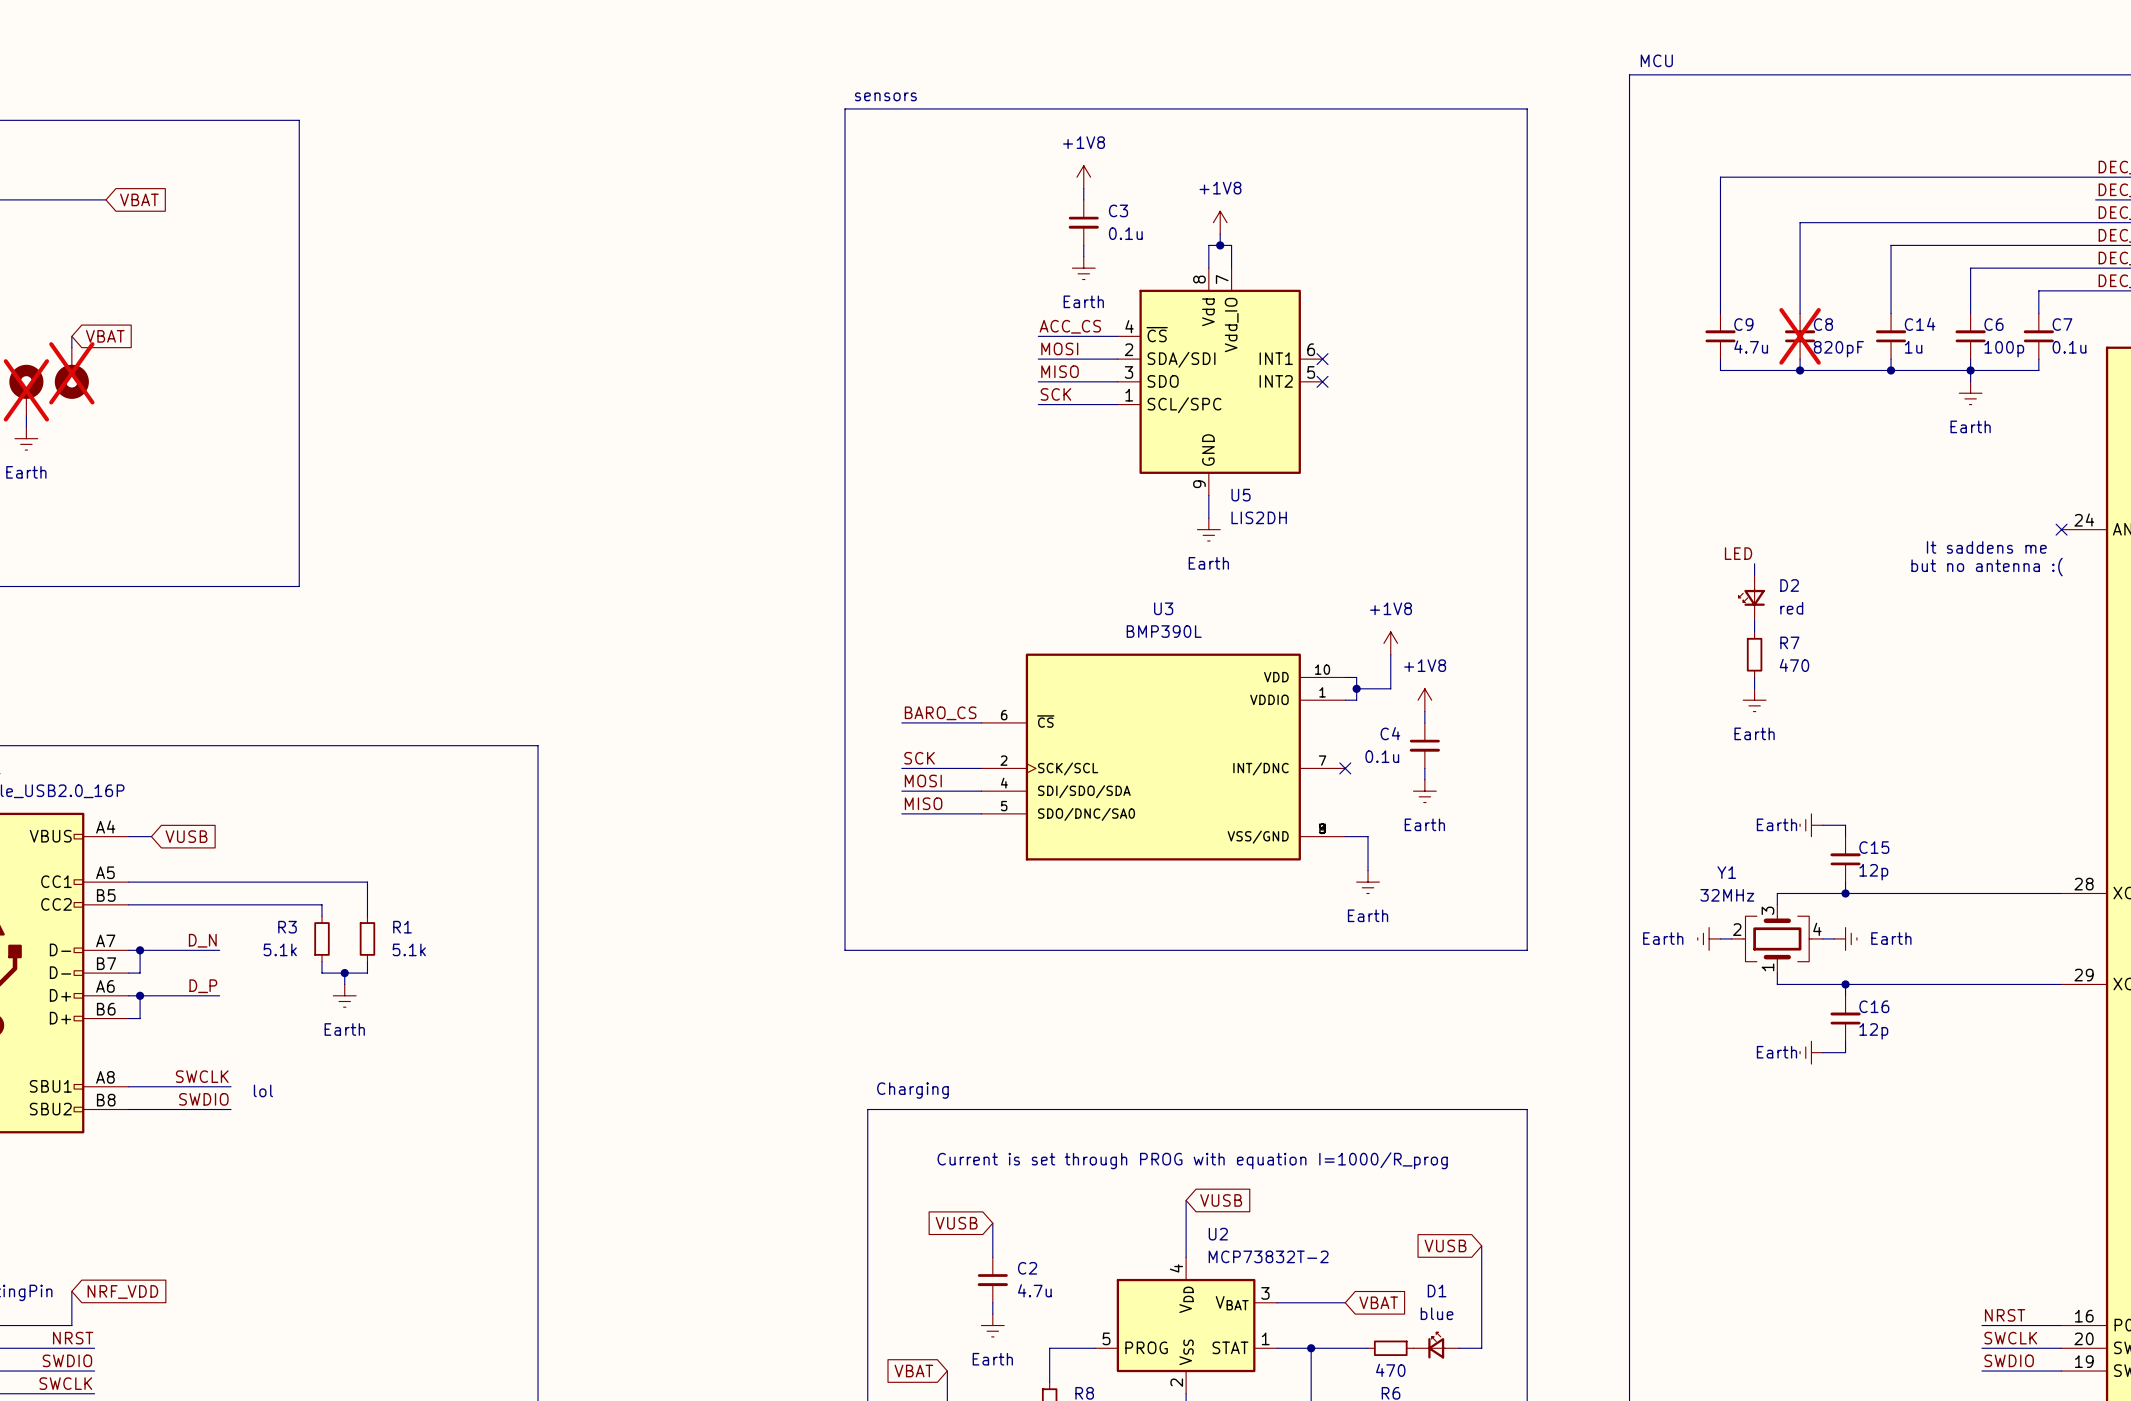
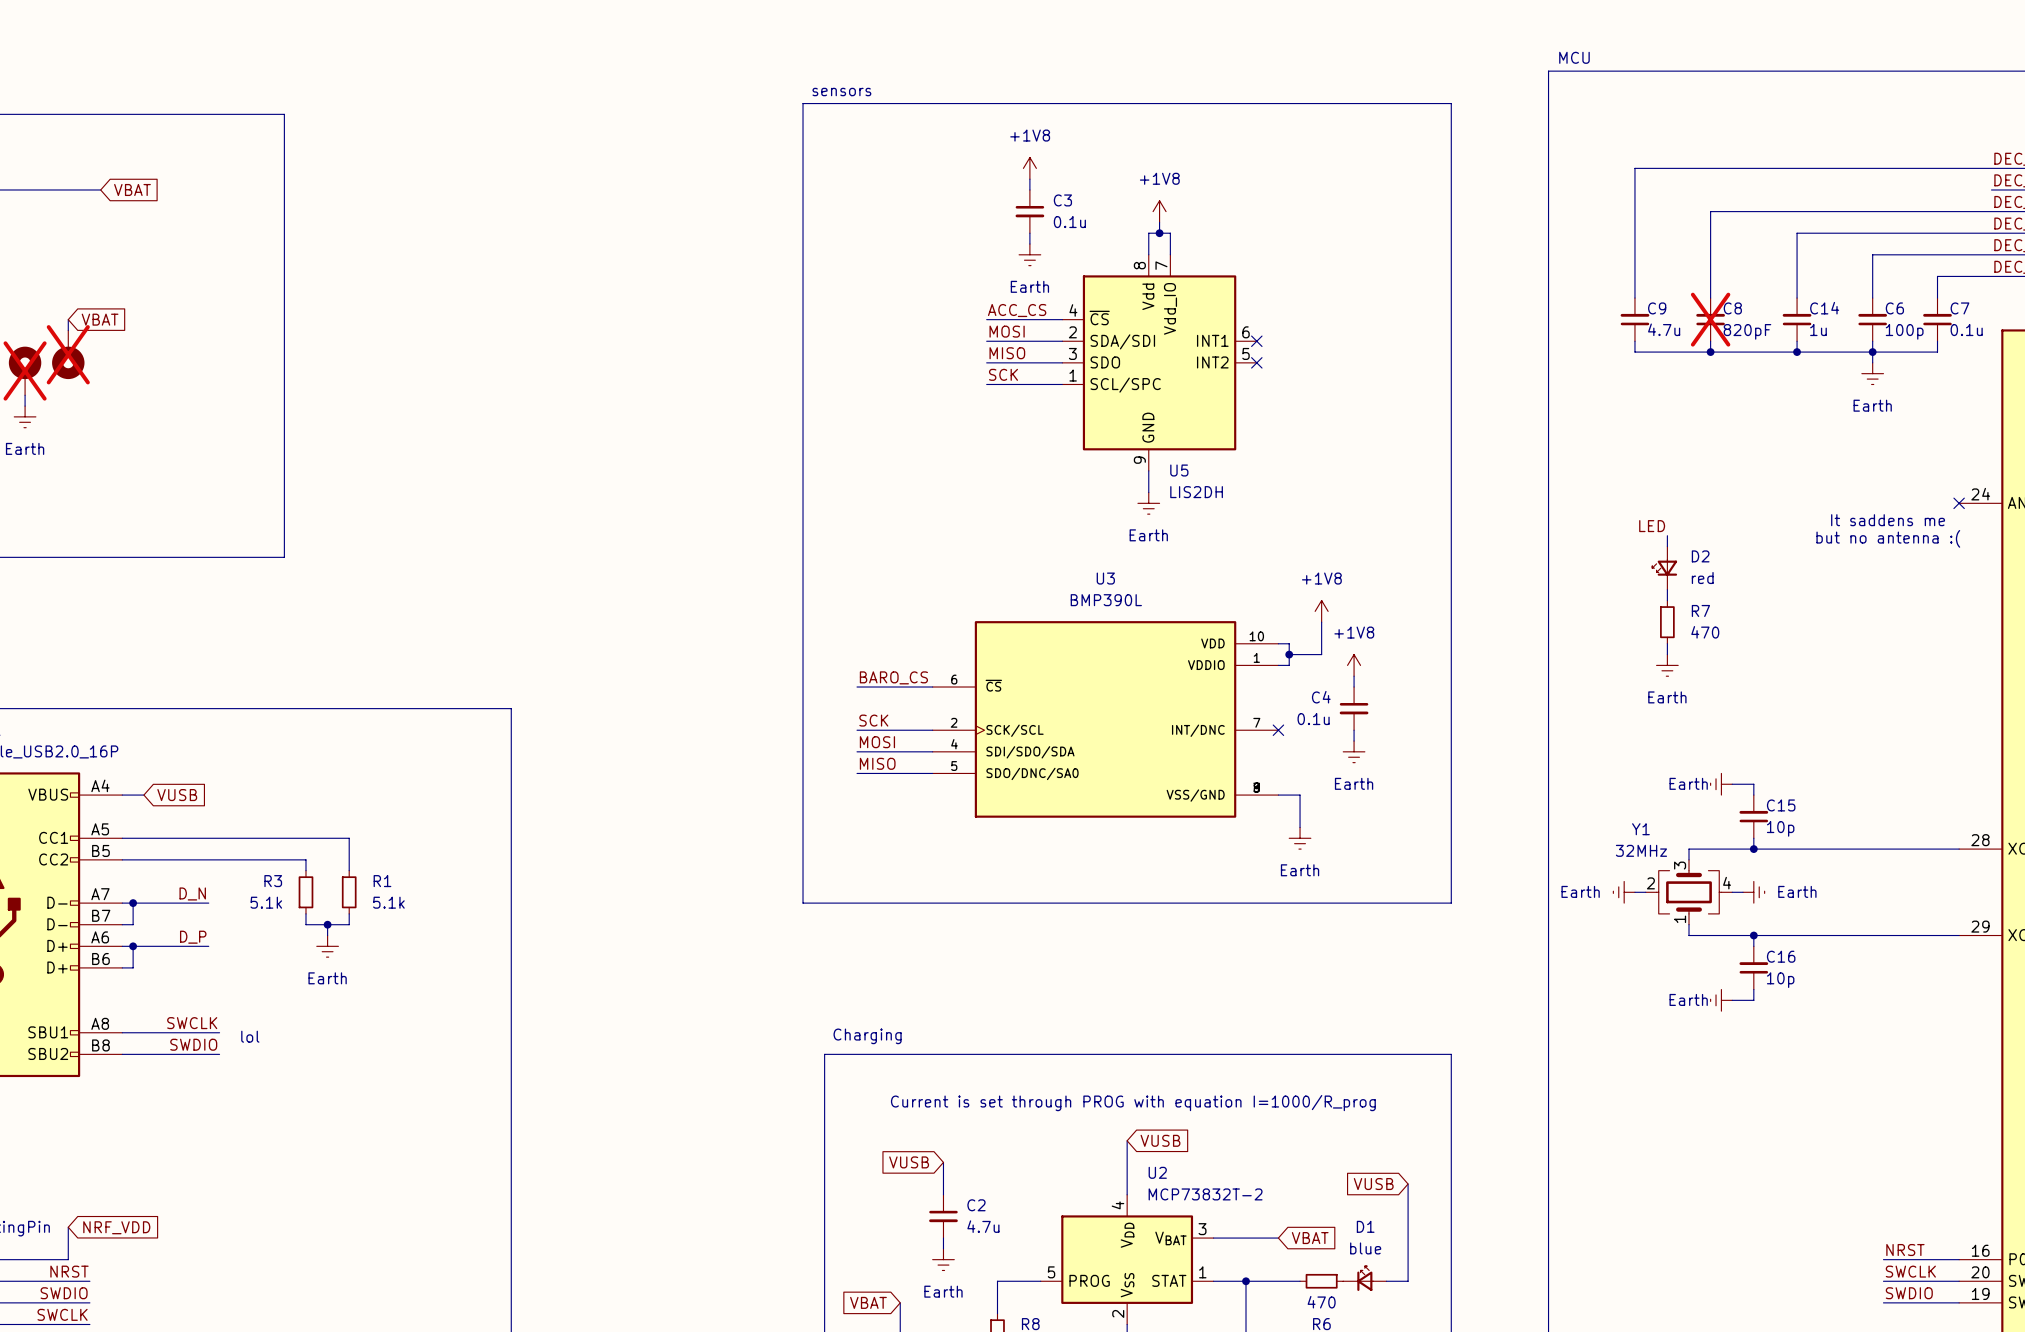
C15 value: 12p (1873, 872) -> 10p (1780, 828)
C16 value: 12p (1873, 1031) -> 10p (1780, 980)

